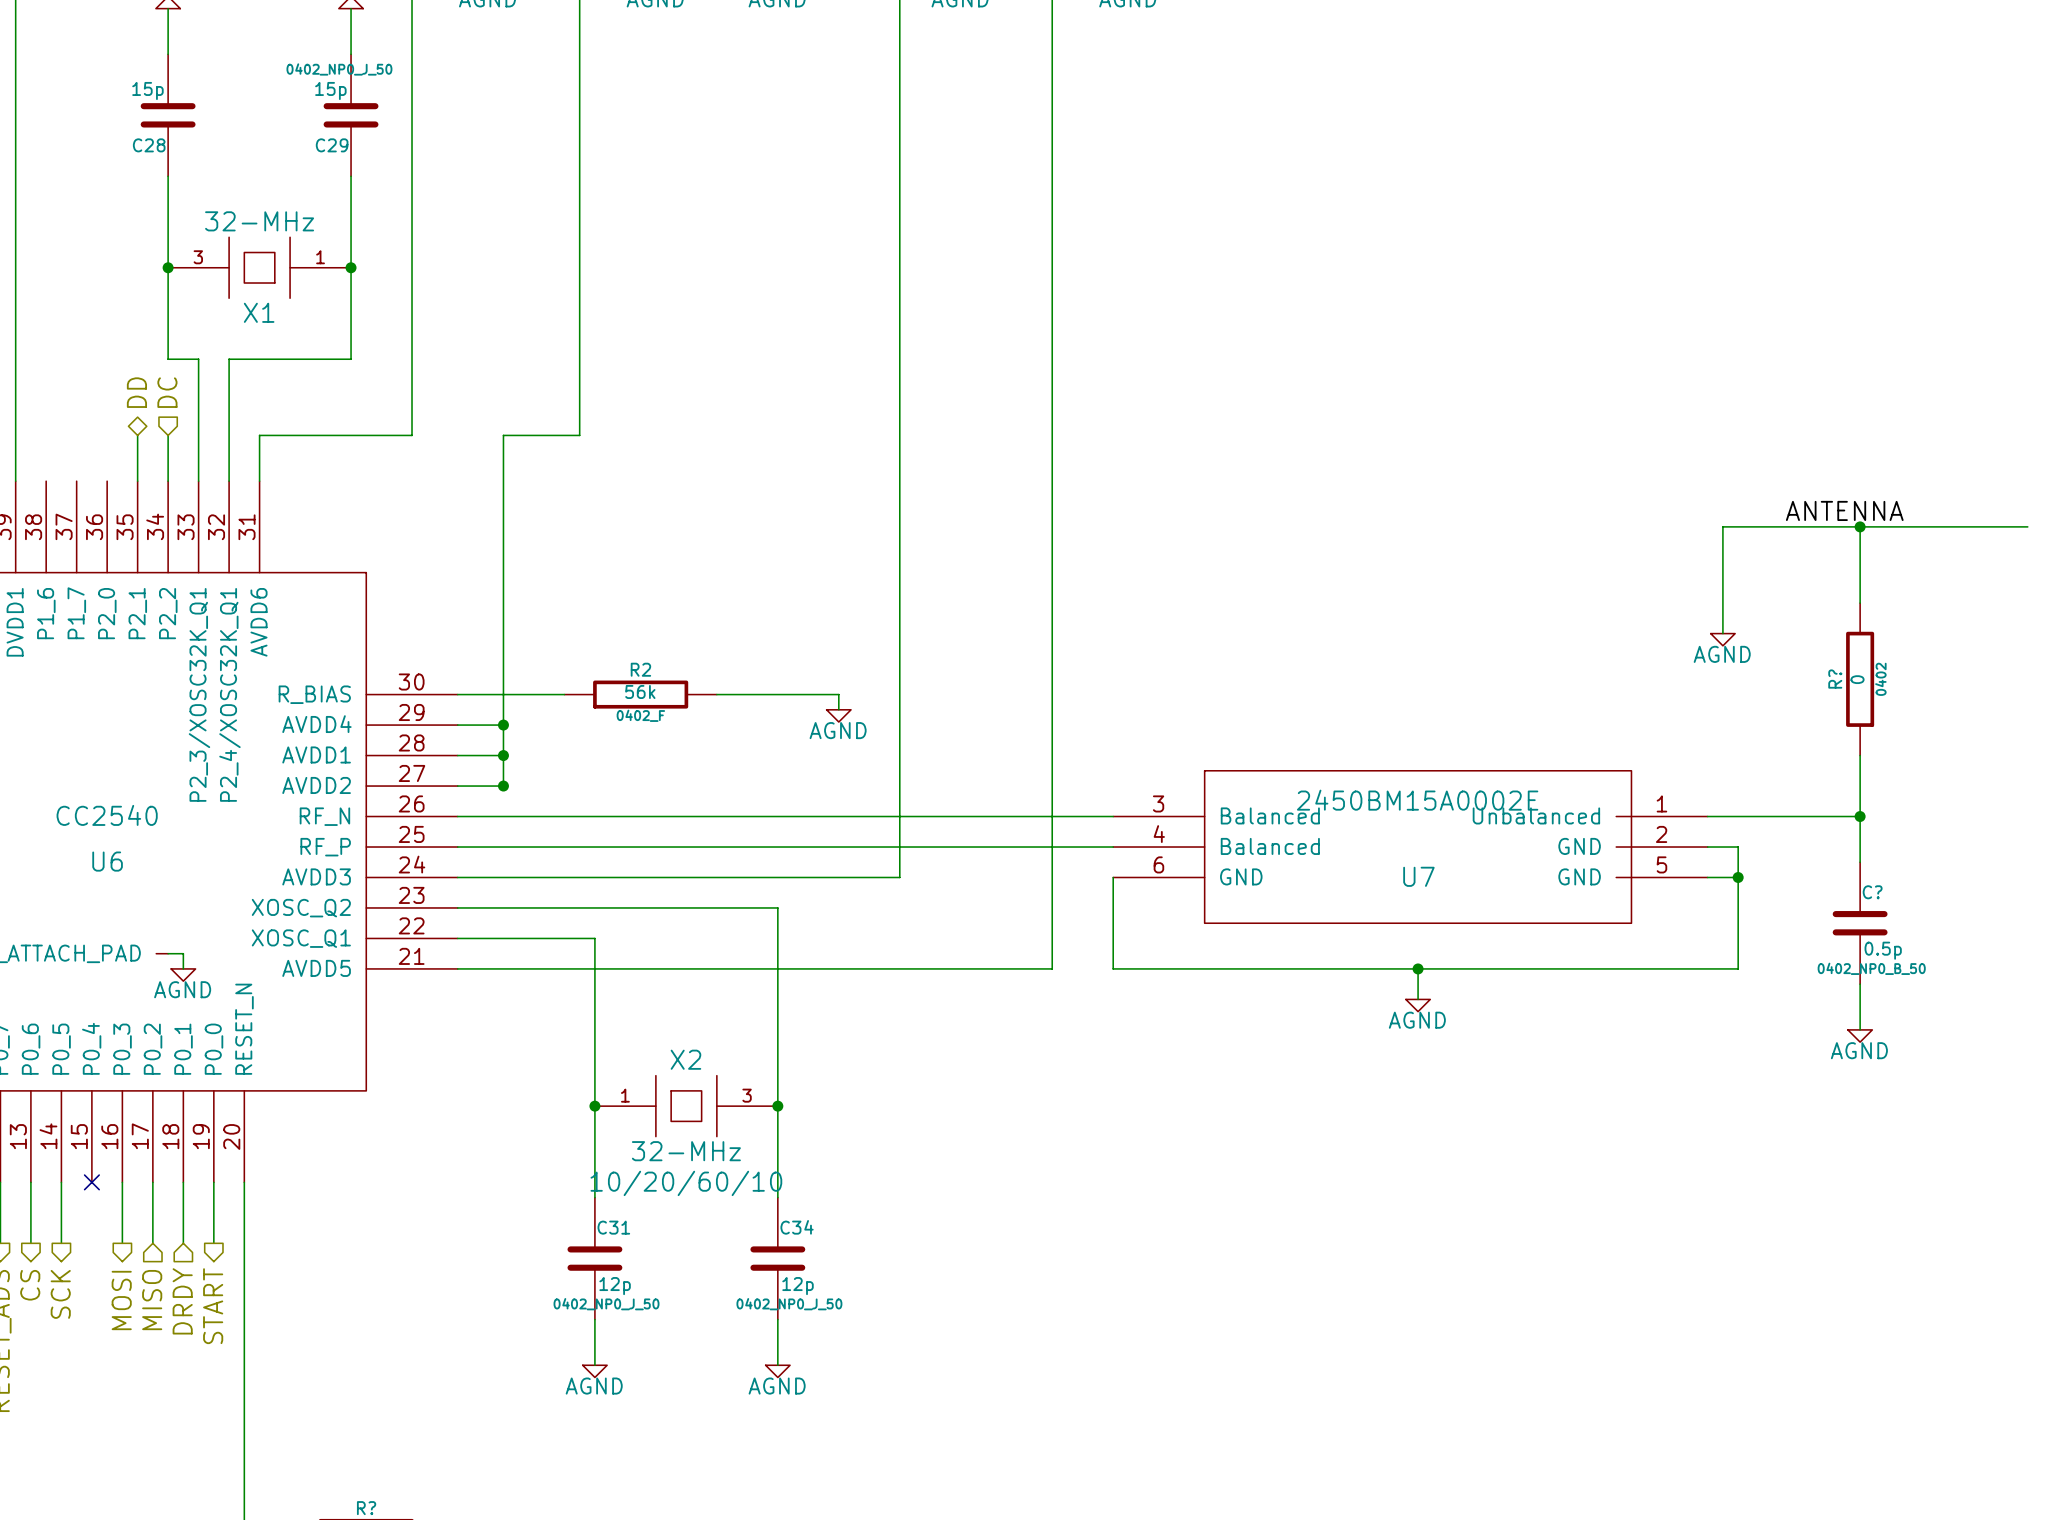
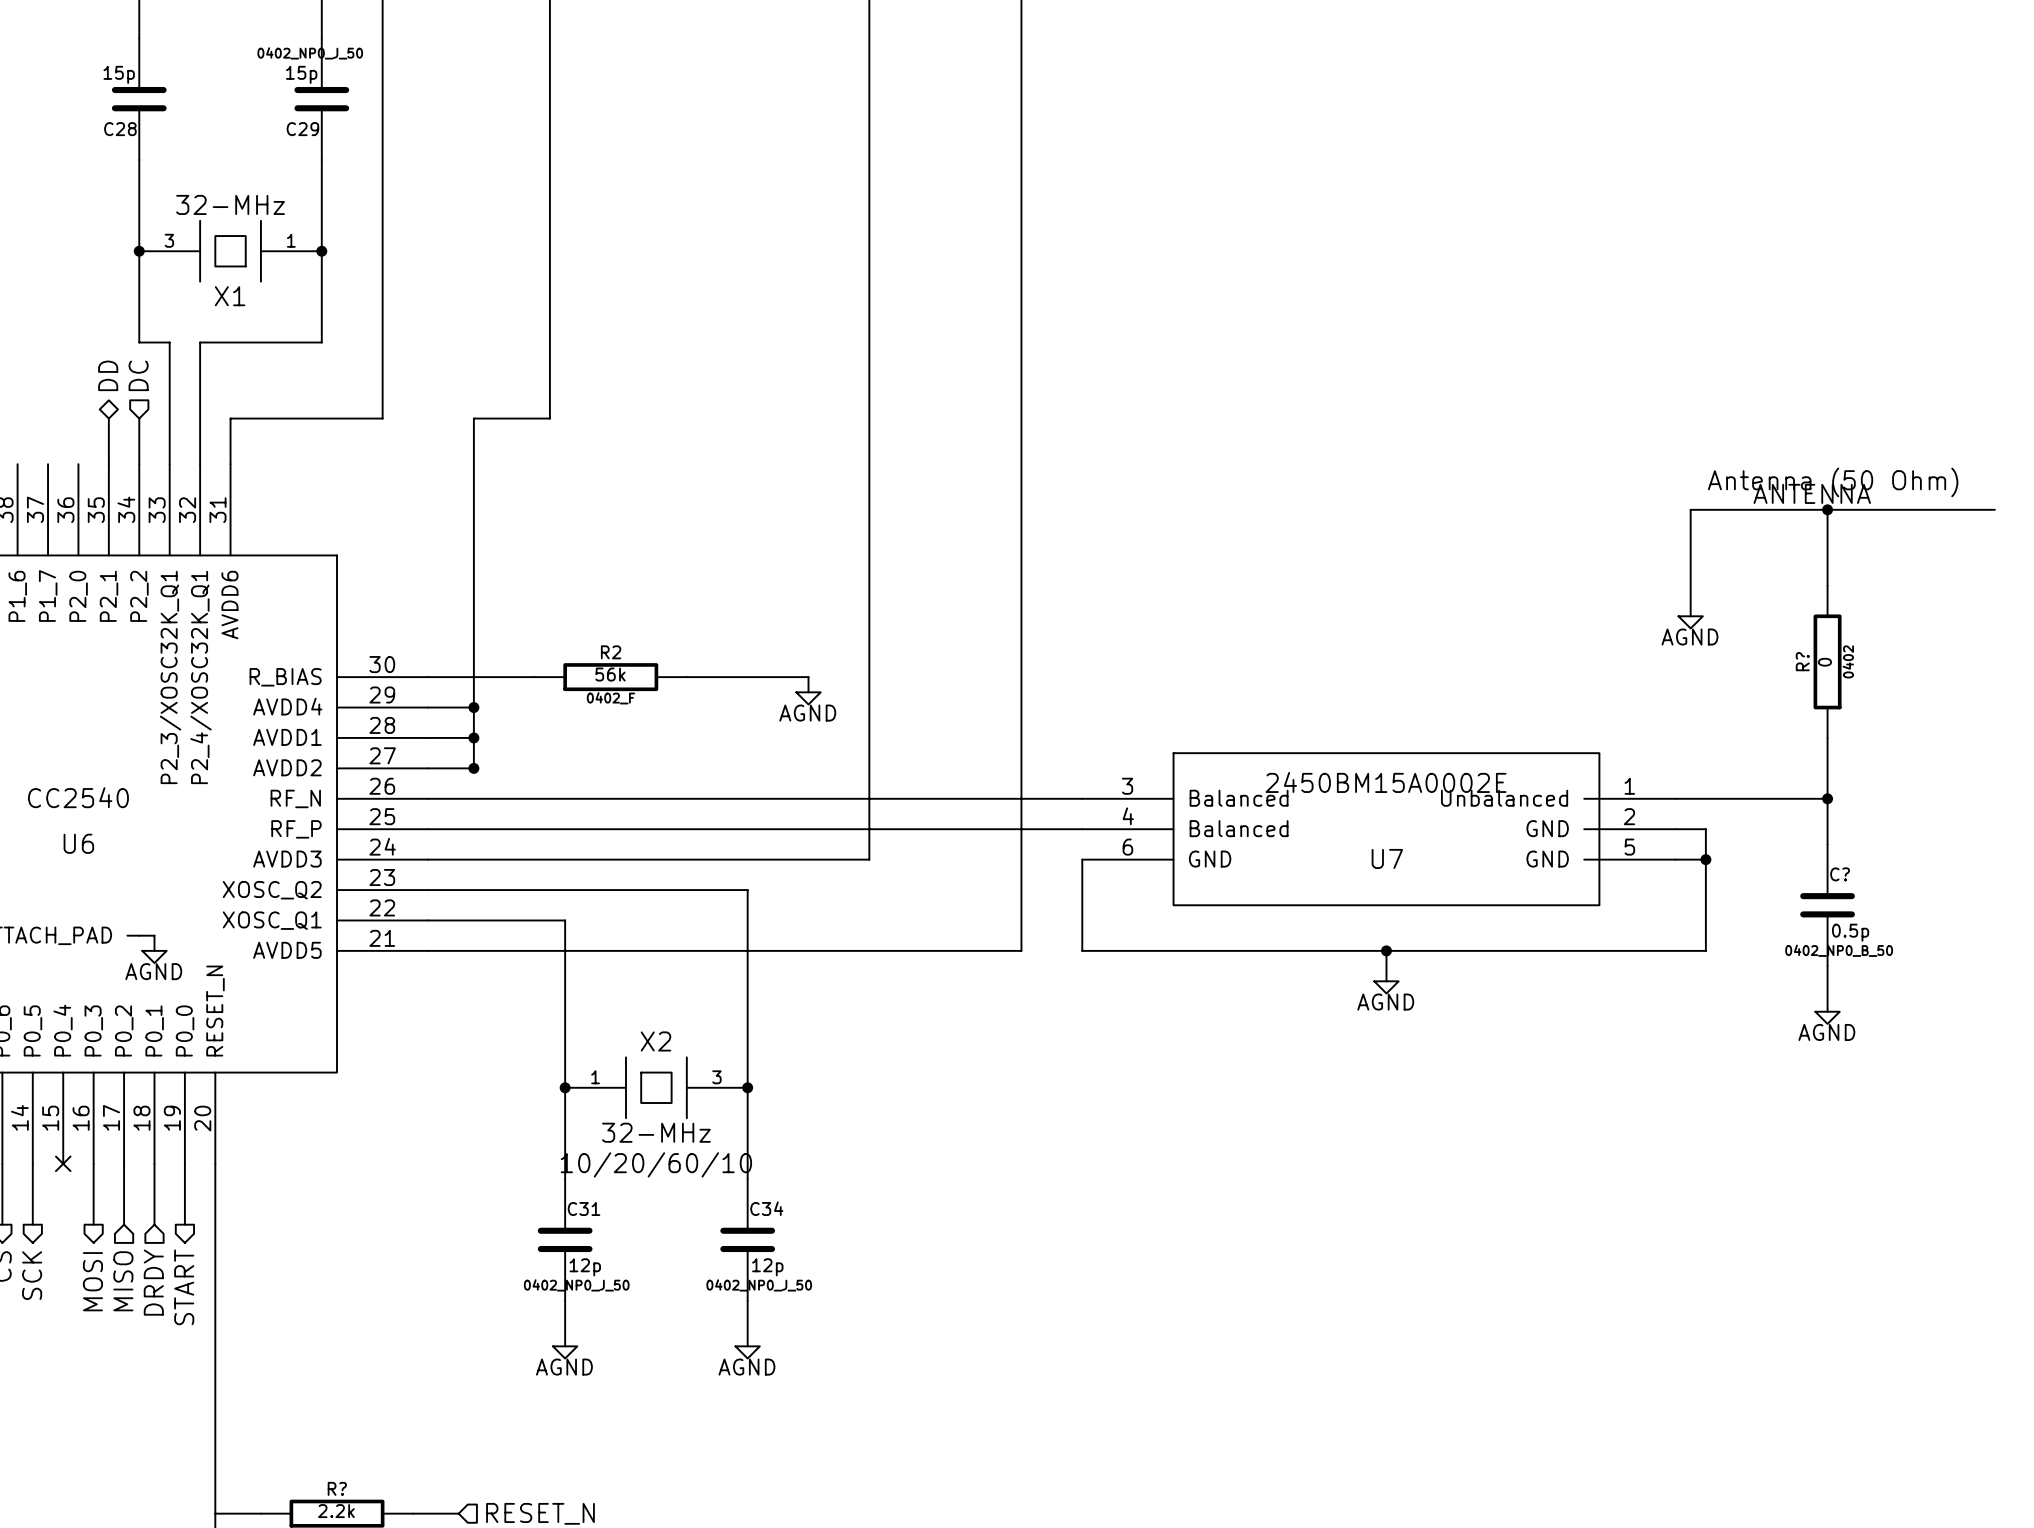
text: none -> Antenna (50 Ohm) (1833, 482)

